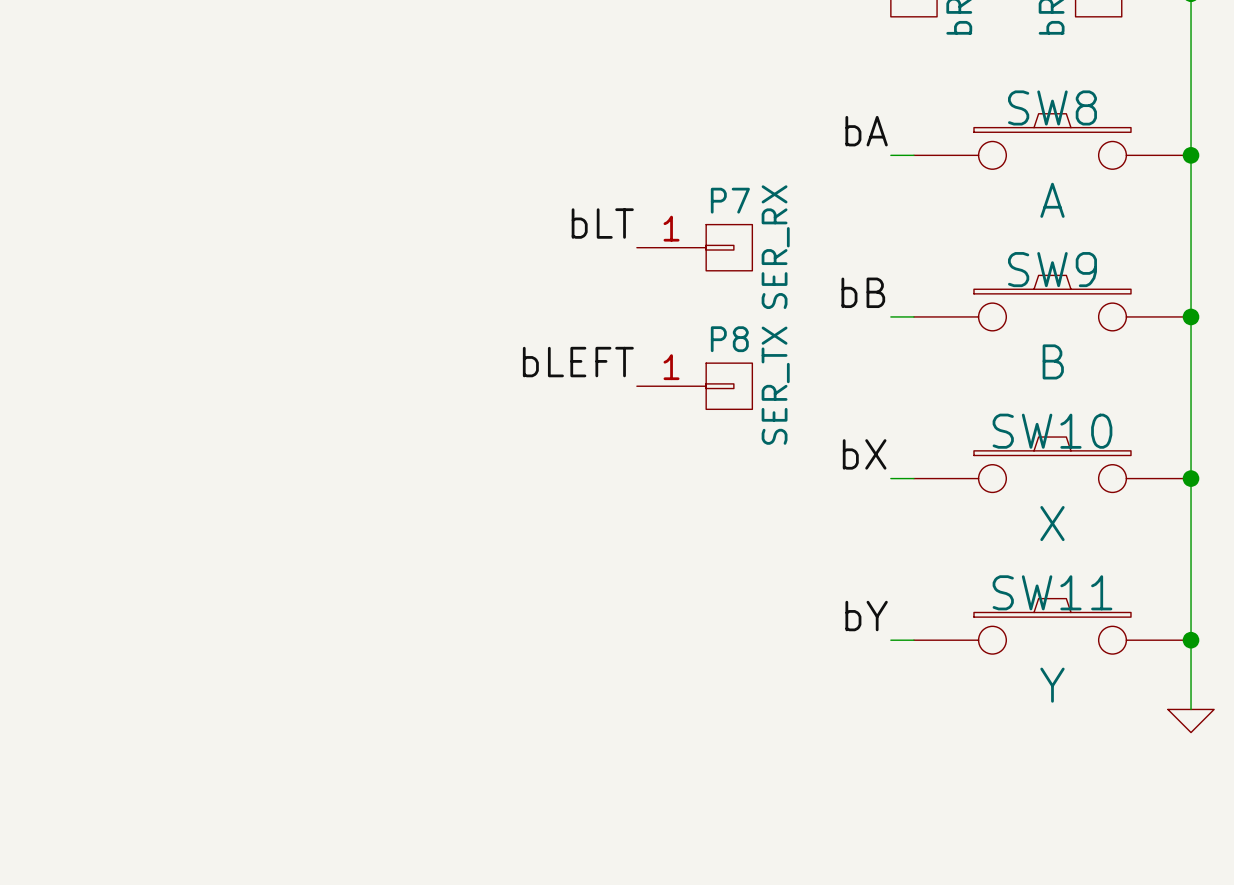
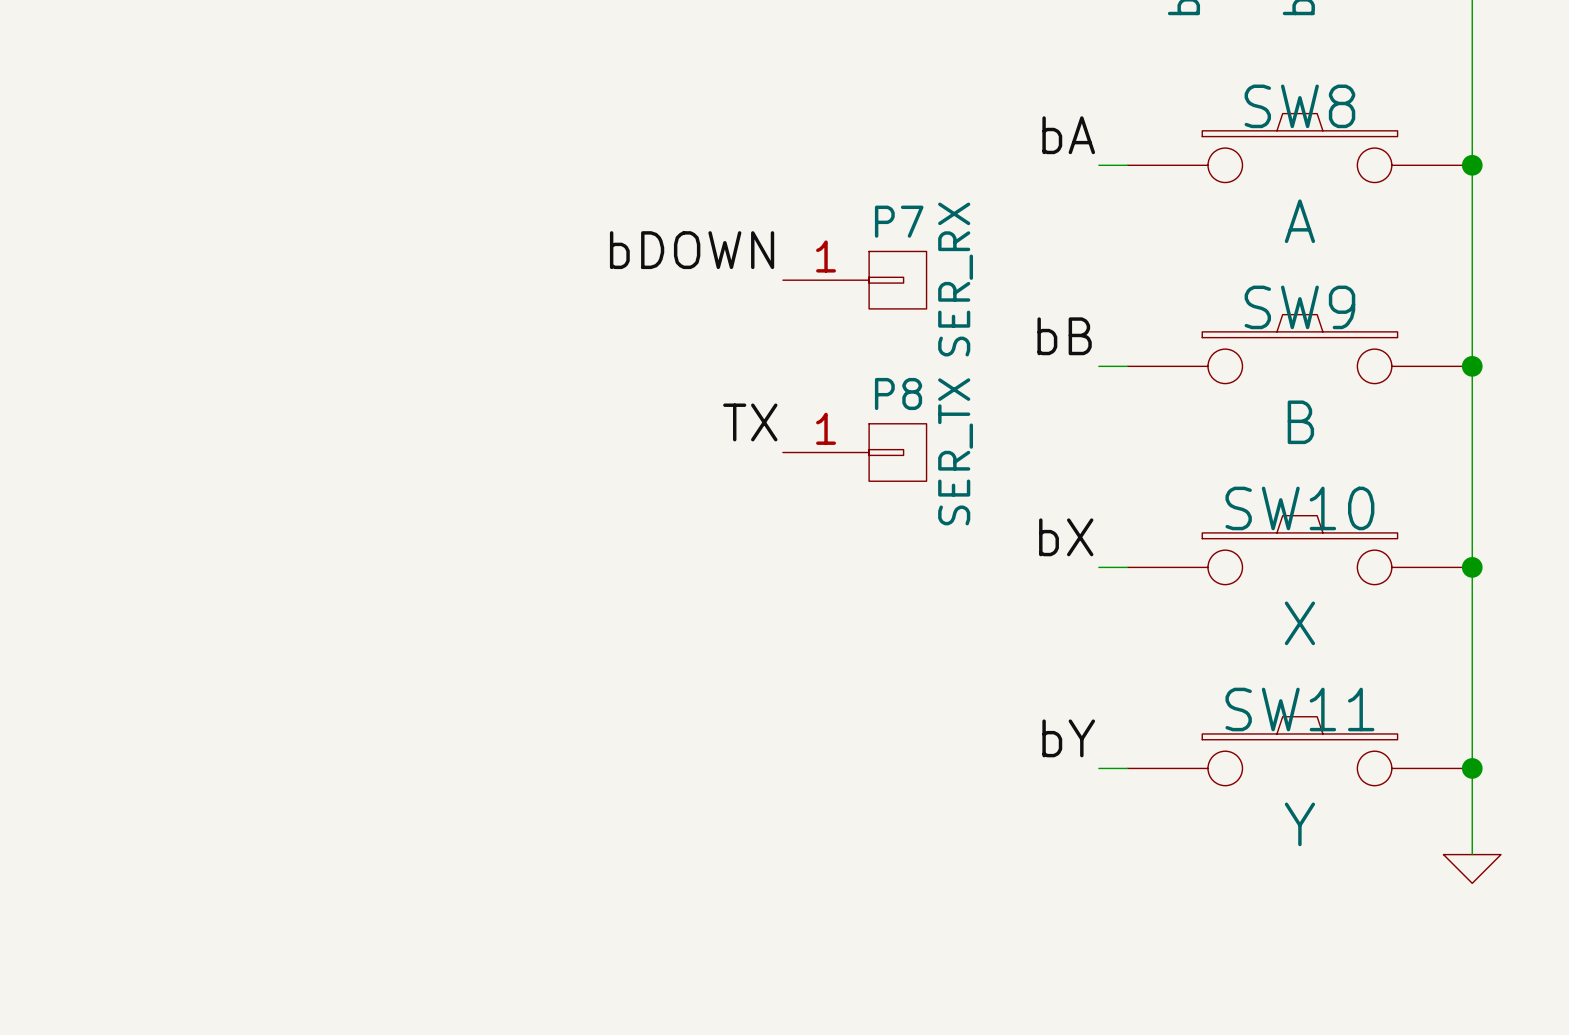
label: bLT (602, 223) -> bDOWN (692, 250)
label: bLEFT (578, 362) -> TX (750, 422)

